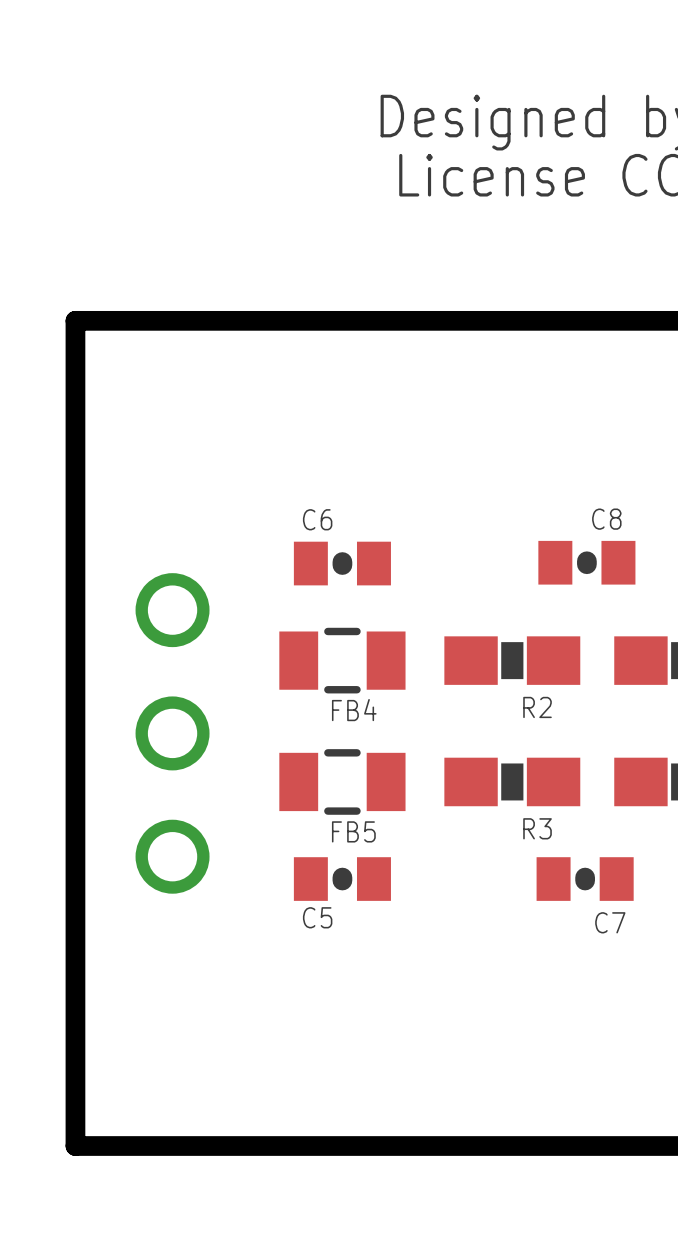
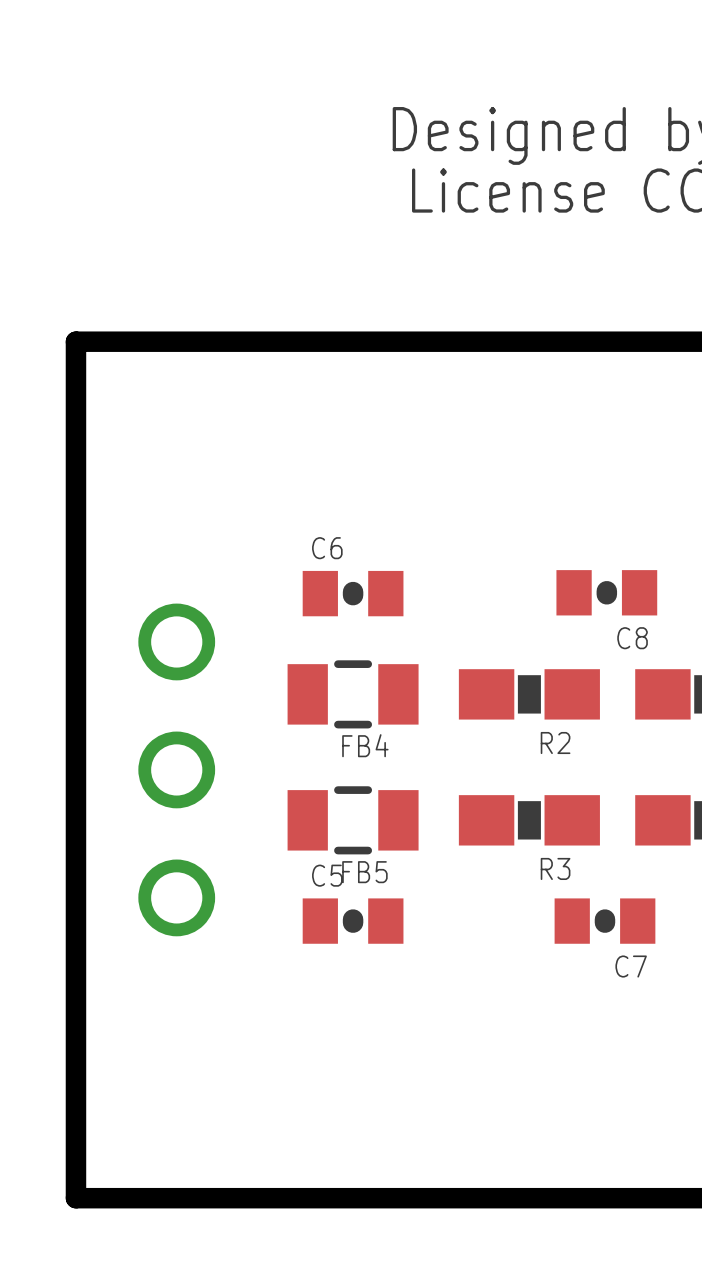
C8 name position: C8 (606, 519) -> C8 (632, 638)
C5 name position: C5 (317, 917) -> C5 (327, 875)

